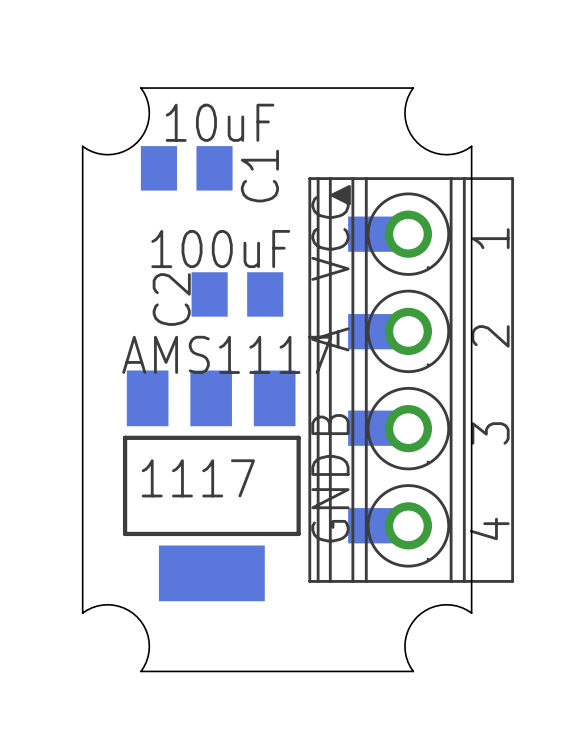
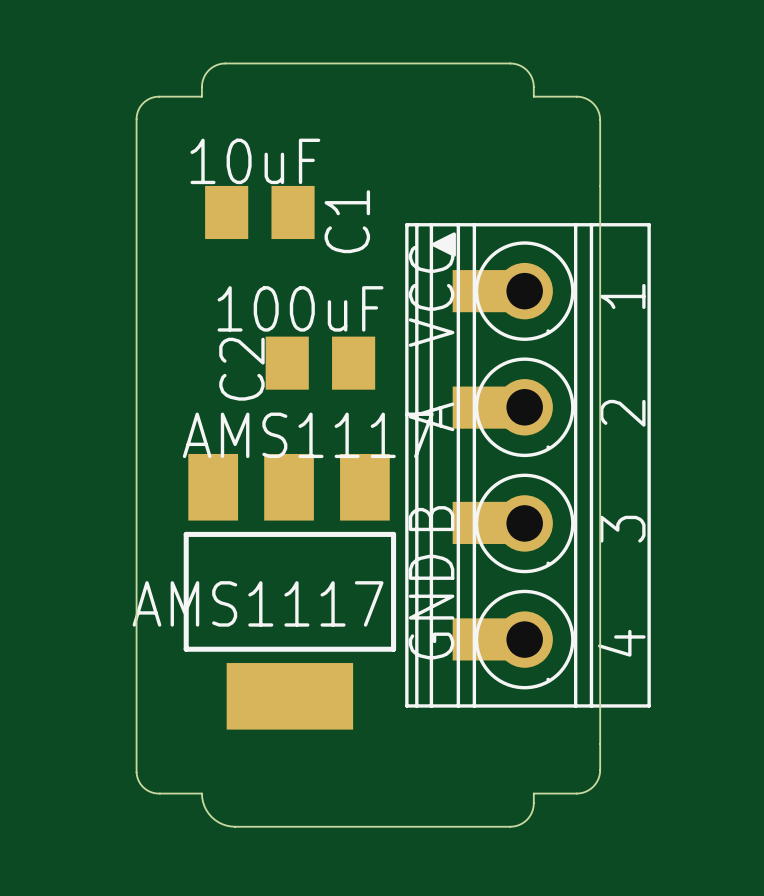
text position: 10uF (220, 122) -> 10uF (255, 161)
board edge: (471, 146) (462, 151) (446, 154) (430, 151) (417, 142) (408, 129) (404, 113) (407, 97) (413, 88) (141, 88) (146, 97) (149, 113) (146, 129) (137, 142) (123, 151) (107, 154) (92, 151) (82, 146) (82, 613) (92, 607) (107, 604) (123, 607) (137, 616) (146, 630) (149, 646) (146, 662) (141, 671) (413, 671) (407, 662) (404, 646) (408, 630) (417, 616) (430, 607) (446, 604) (462, 607) (471, 613) -> (600, 186) (600, 120) (595, 105) (588, 99) (579, 96) (533, 96) (533, 83) (530, 75) (524, 68) (513, 63) (222, 63) (211, 68) (205, 75) (202, 83) (201, 96) (151, 97) (141, 105) (136, 116) (136, 772) (140, 783) (146, 789) (154, 793) (201, 793) (204, 806) (208, 813) (218, 822) (230, 826) (513, 826) (524, 821) (530, 815) (533, 806) (533, 793) (579, 793) (593, 786) (599, 773) (600, 743)
text: 1117 (198, 478) -> AMS1117 (258, 603)

